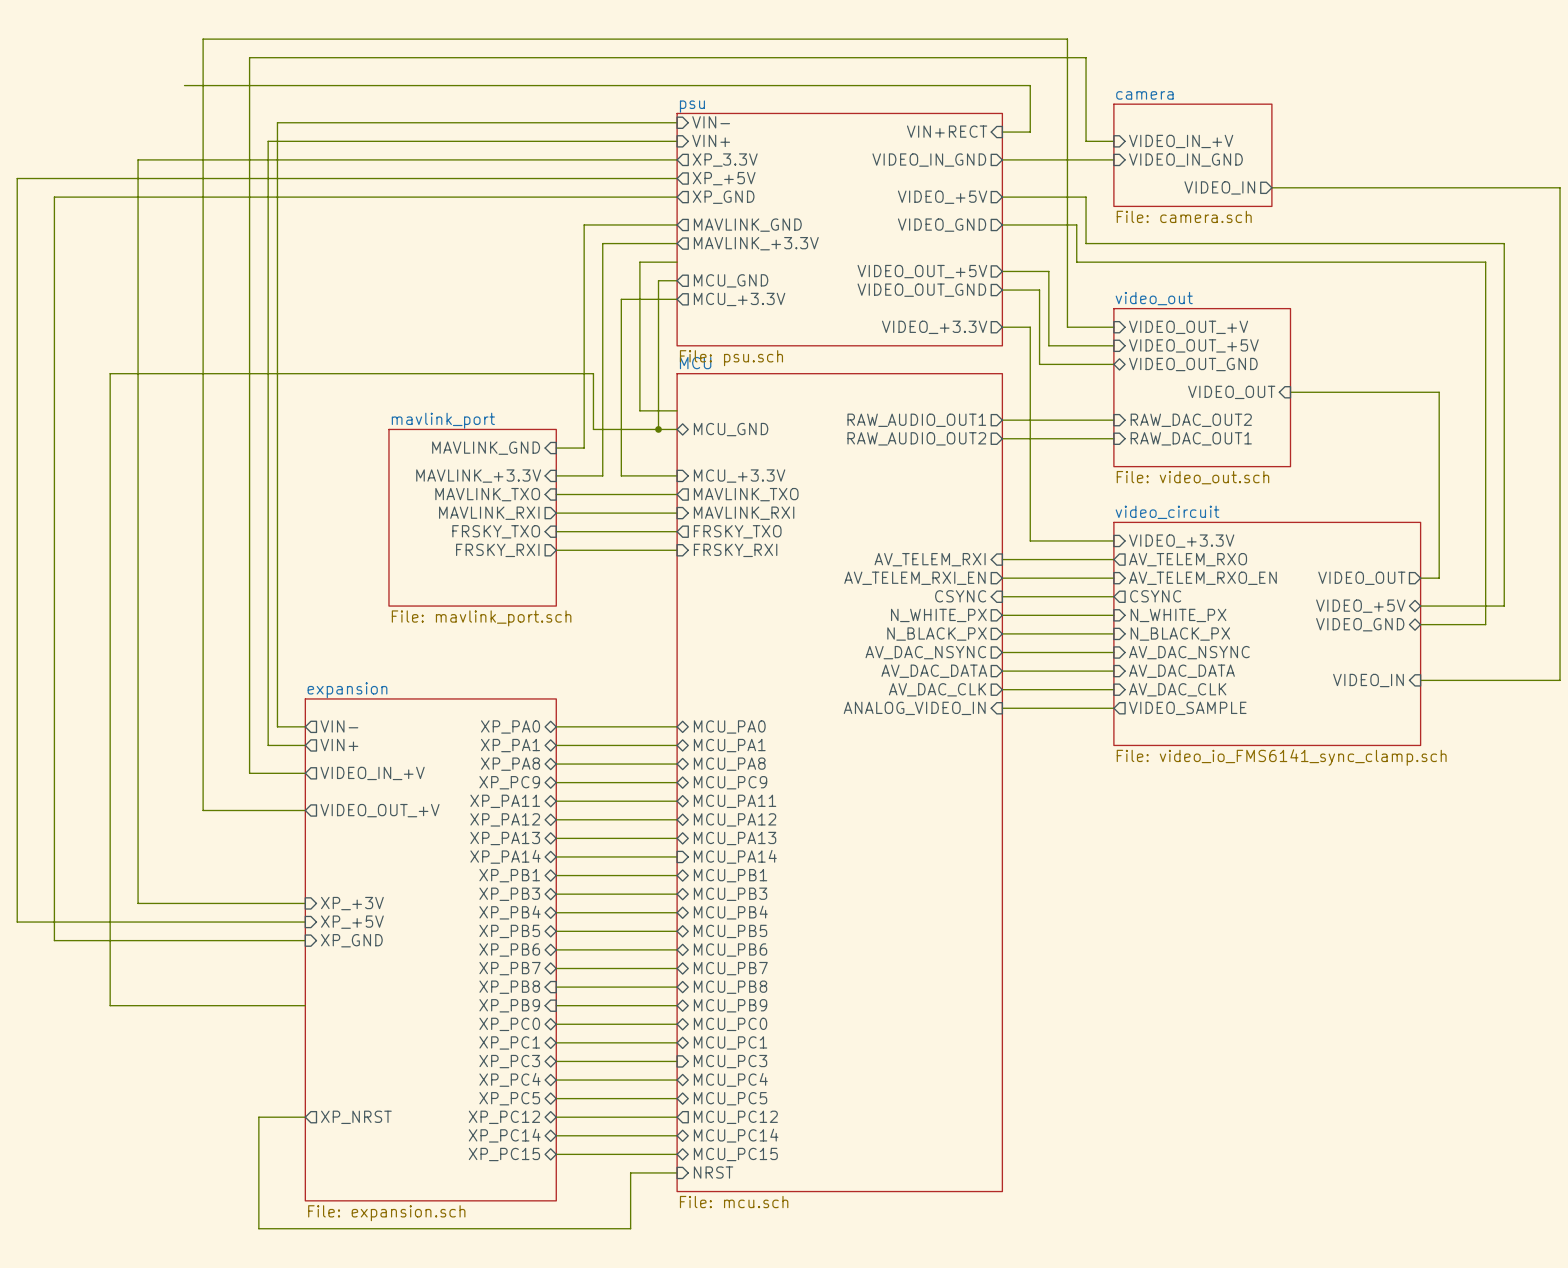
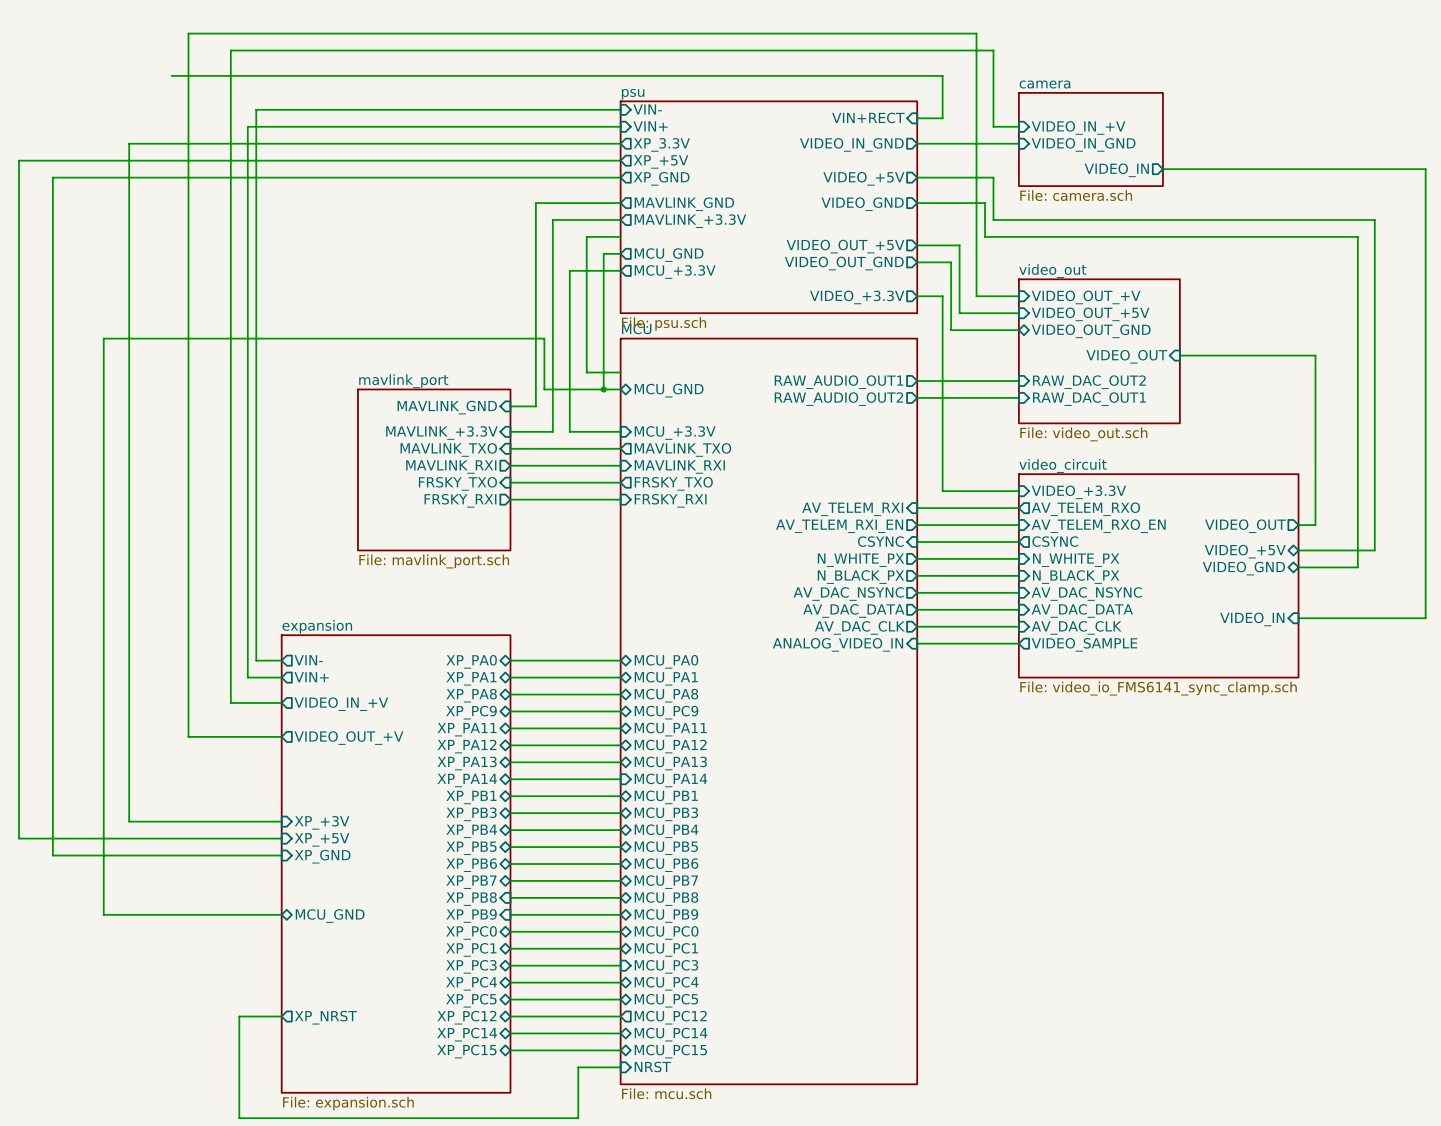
sheet pin: none -> MCU_GND (330, 916)

